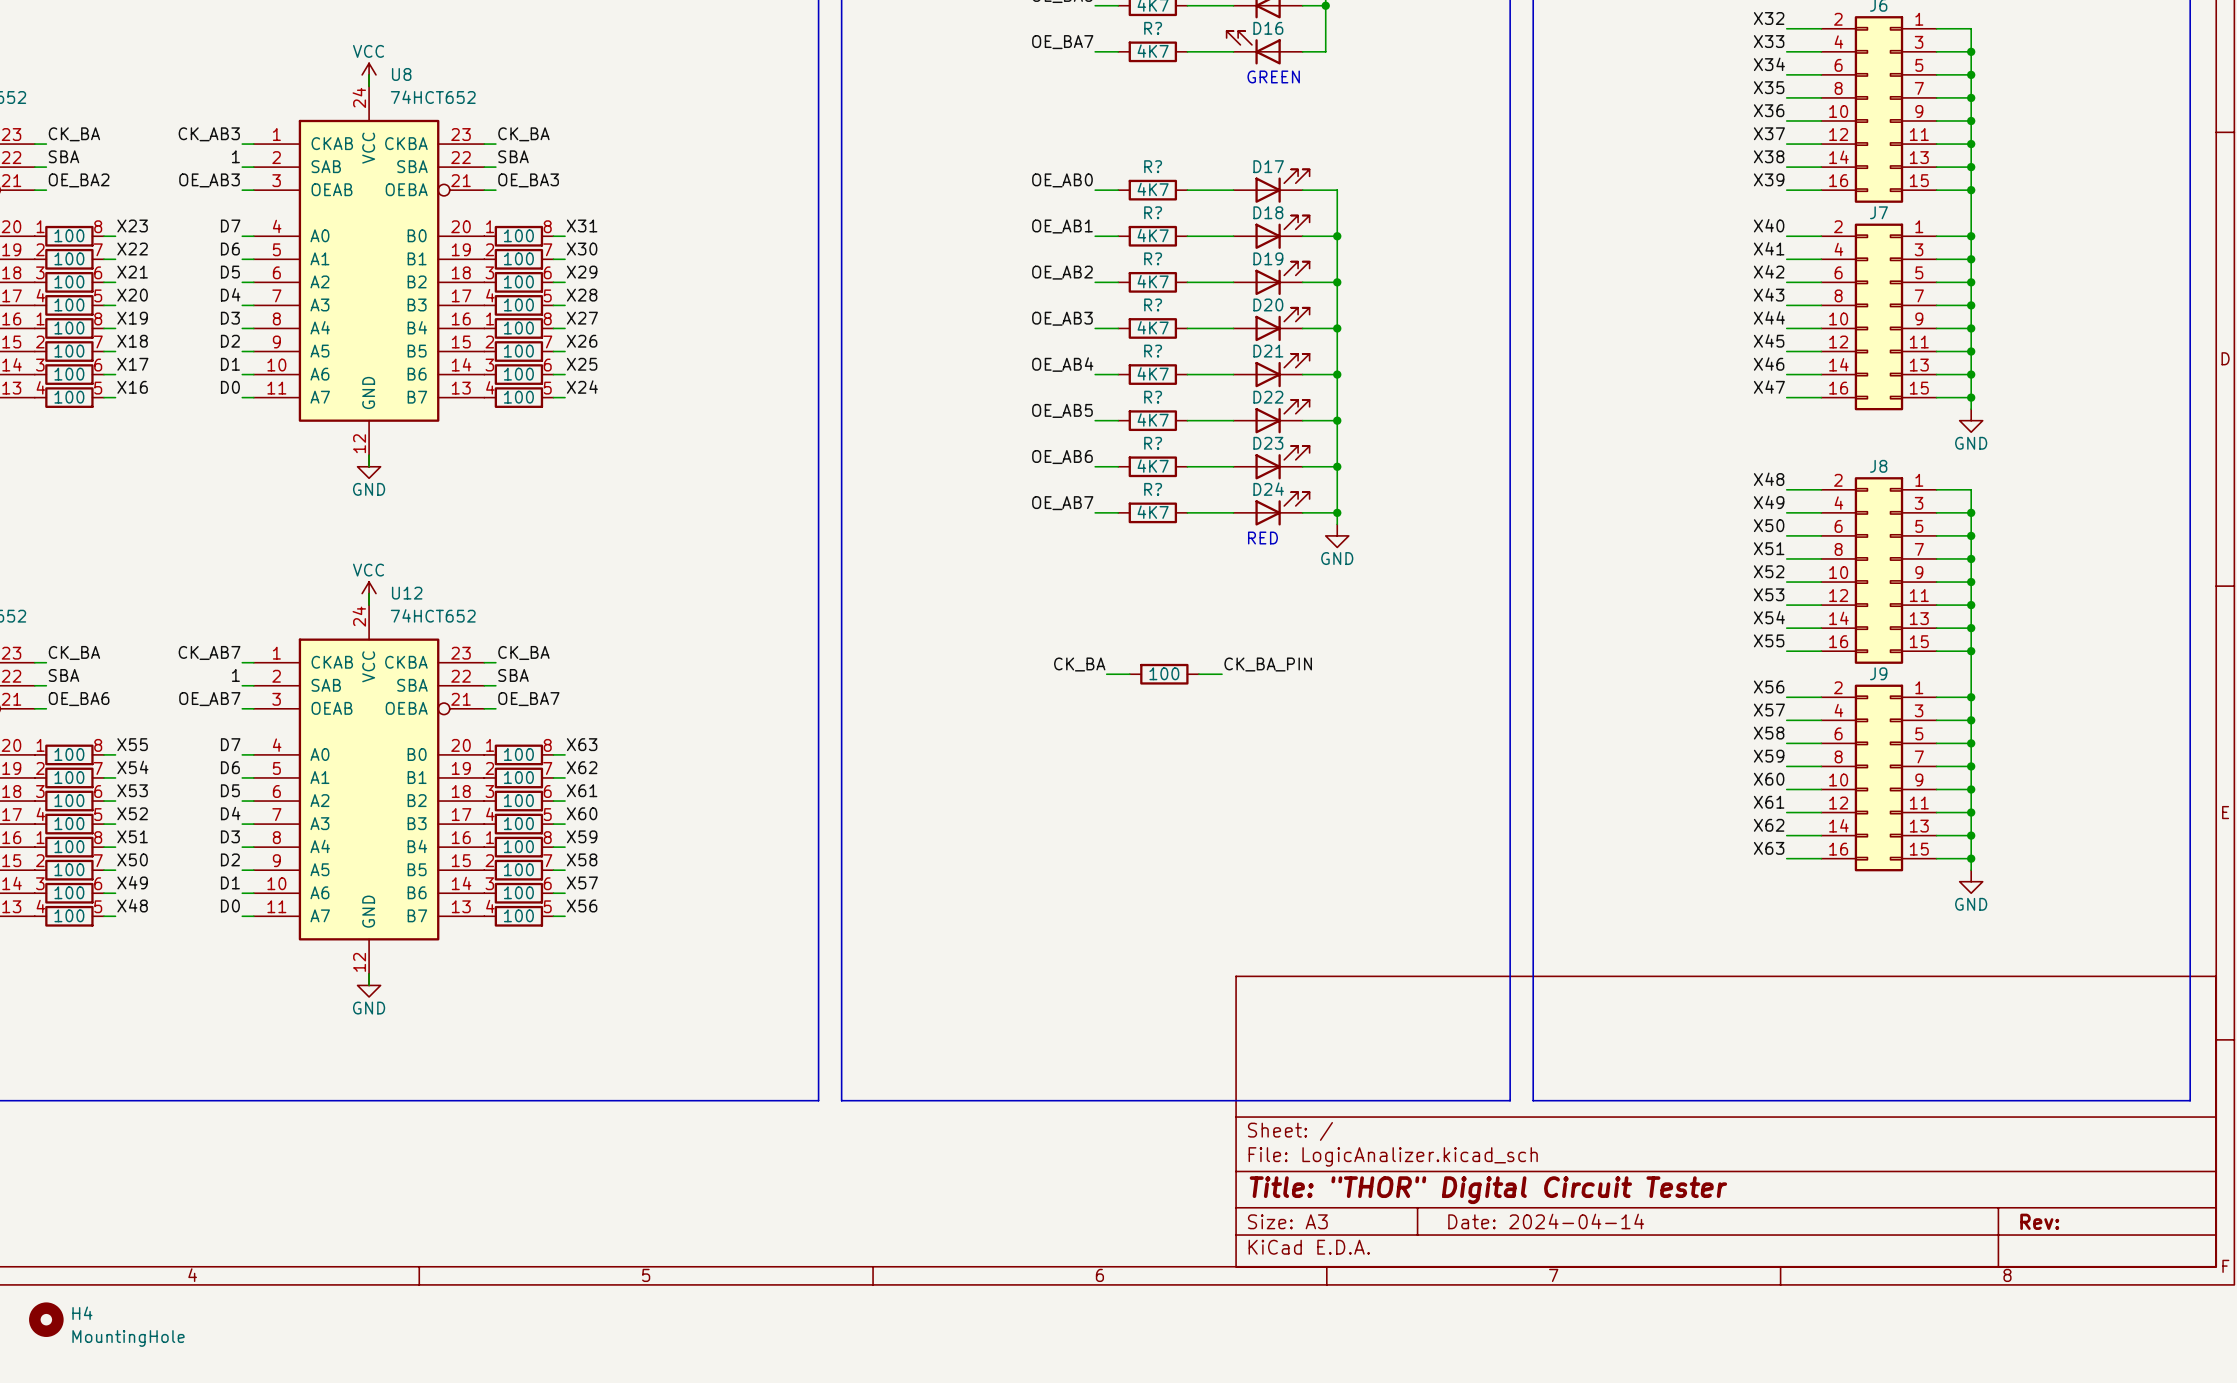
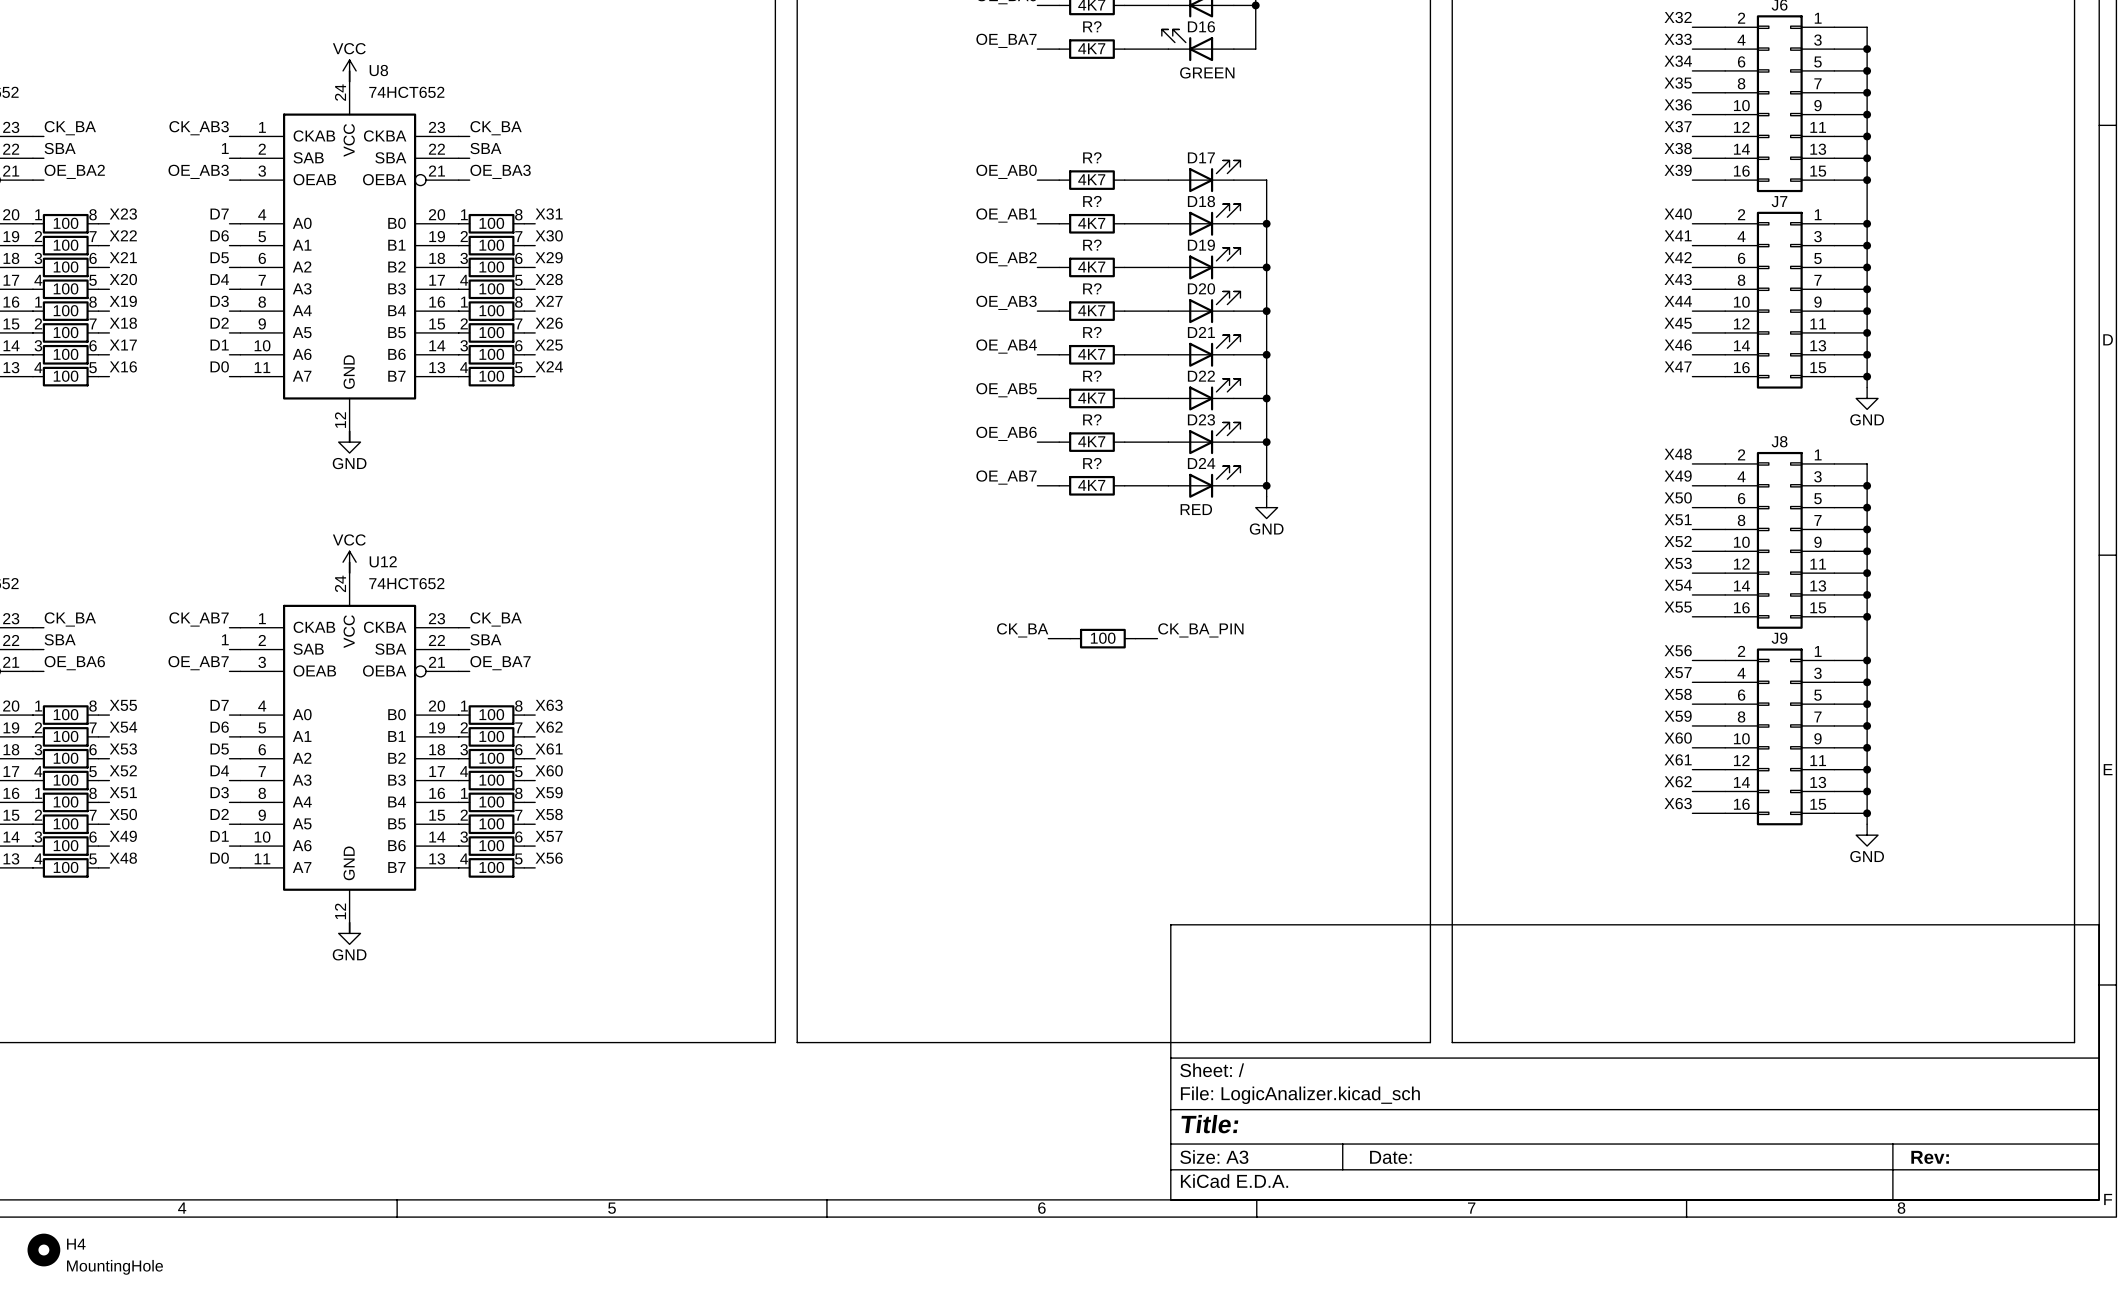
title block: Title: "THOR" Digital Circuit Tester (1488, 1190) -> Title: (1209, 1124)
title block: Date: 2024-04-14 (1546, 1221) -> Date: (1390, 1157)

